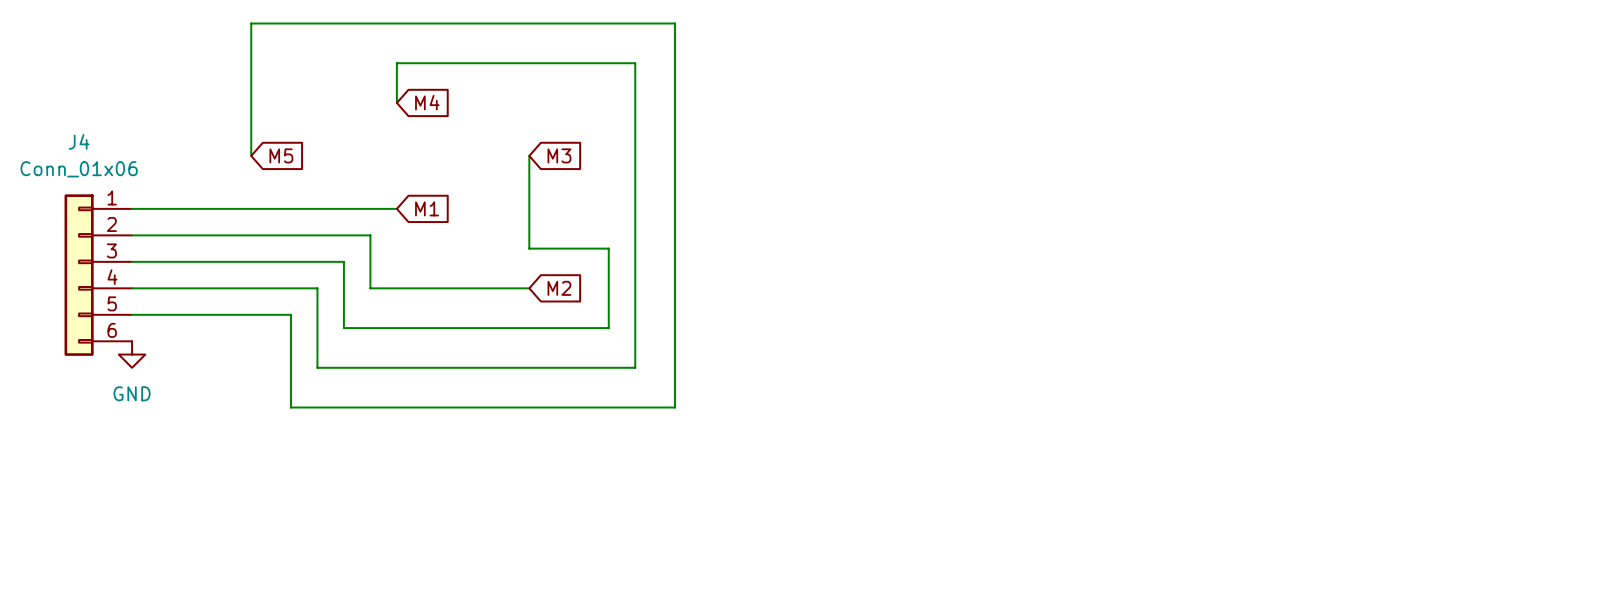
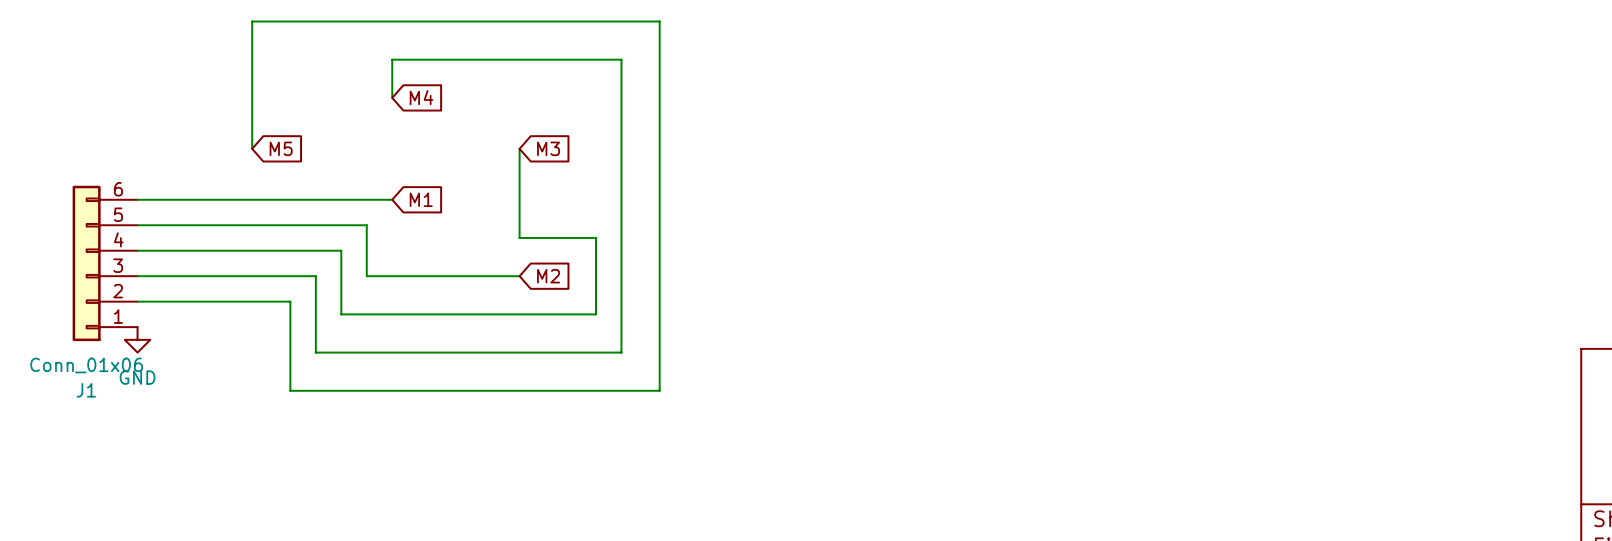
J4 name: J4 (79, 141) -> J1 (86, 390)
J4 flip: as is (79, 275) -> up-down (86, 263)

